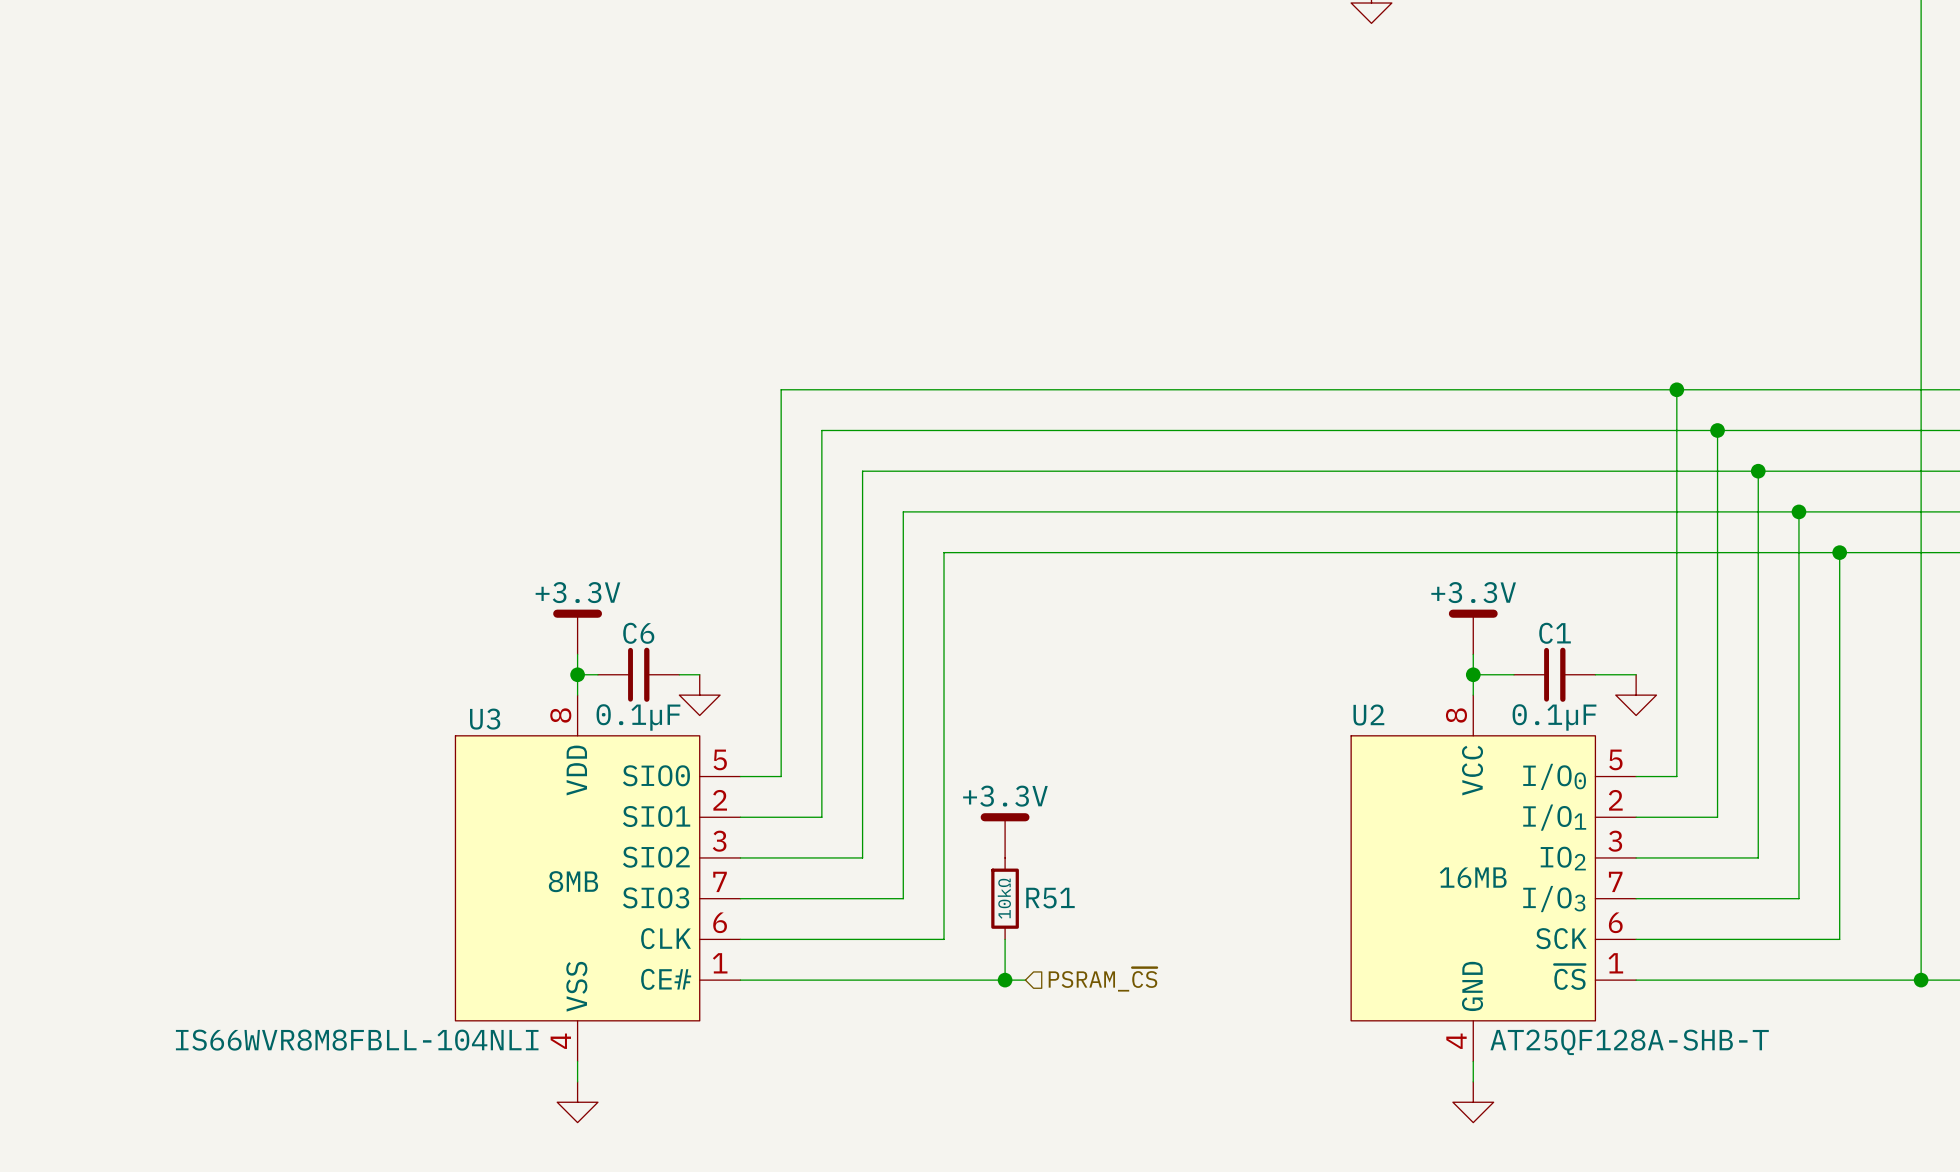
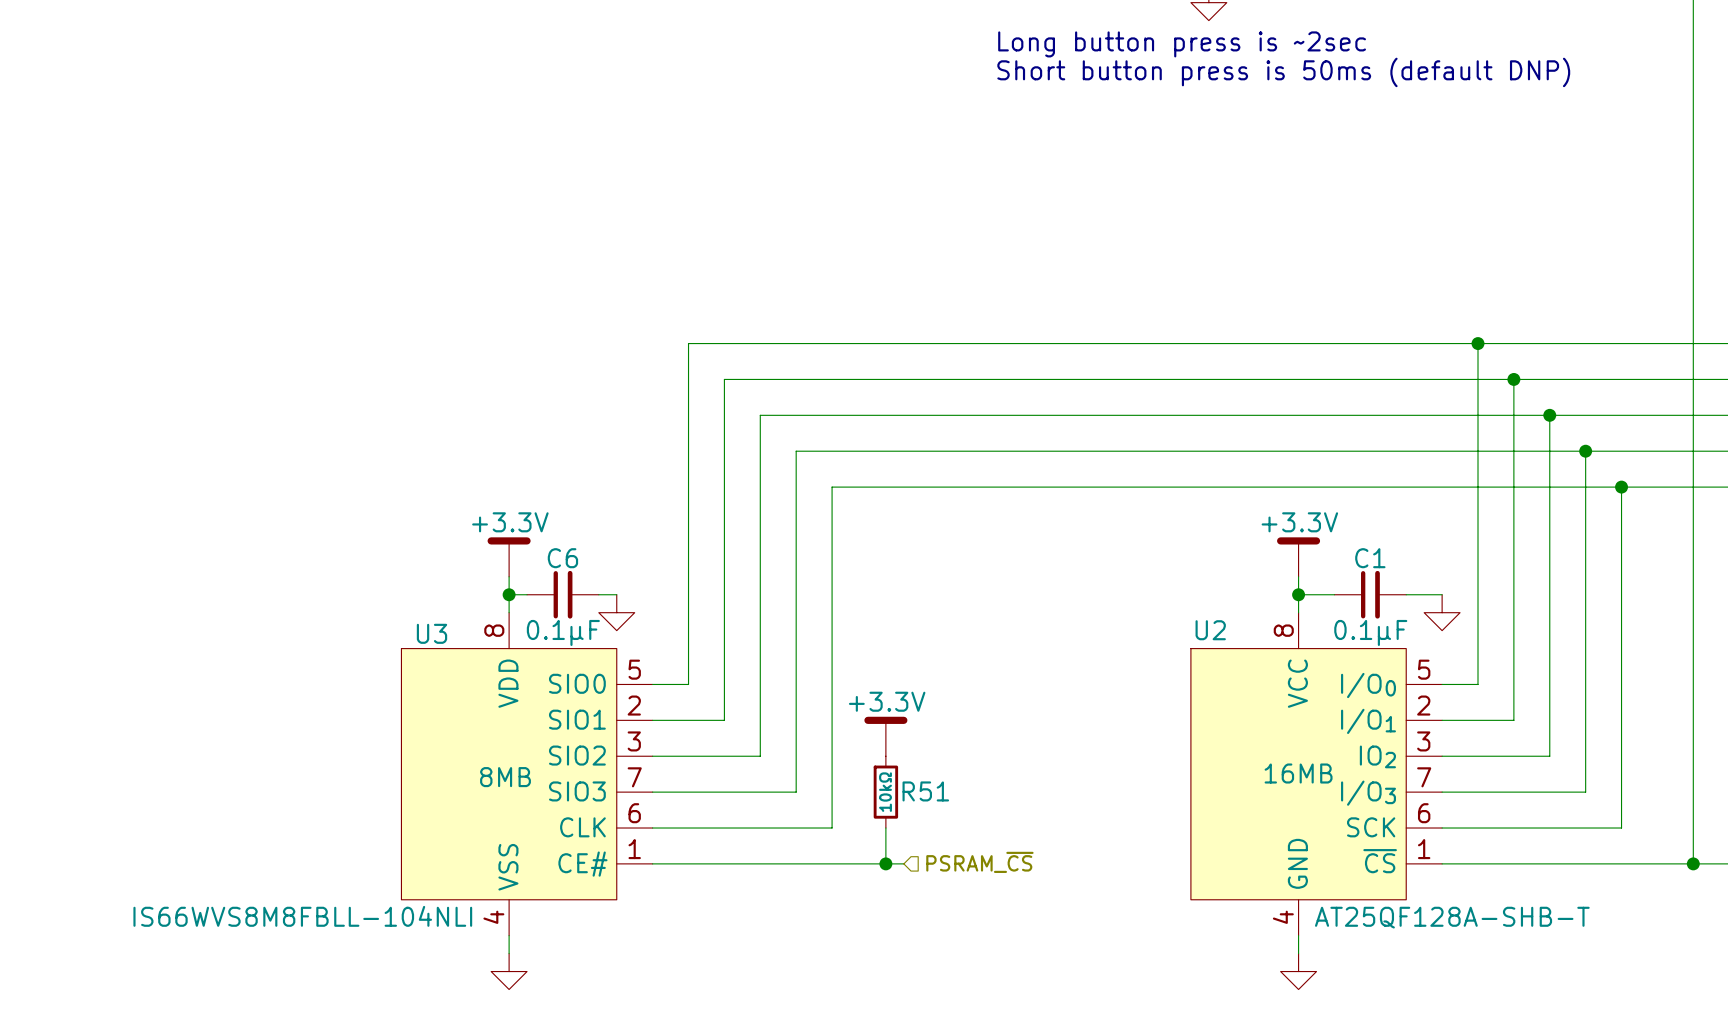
text: none -> Long button press is ~2sec (1182, 44)
text: none -> Short button press is 50ms (default DNP) (1283, 72)
U3 value: IS66WVR8M8FBLL-104NLI (357, 1040) -> IS66WVS8M8FBLL-104NLI (302, 916)

